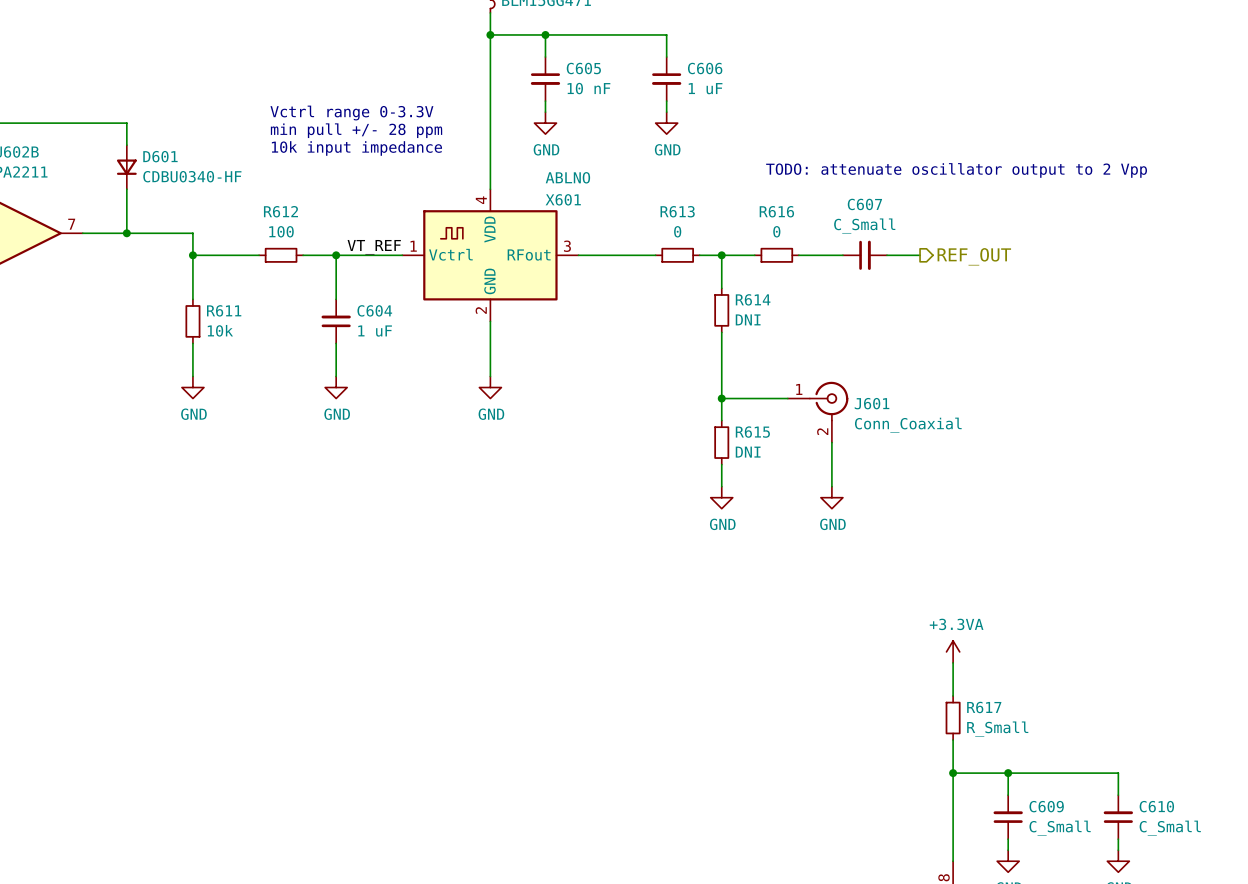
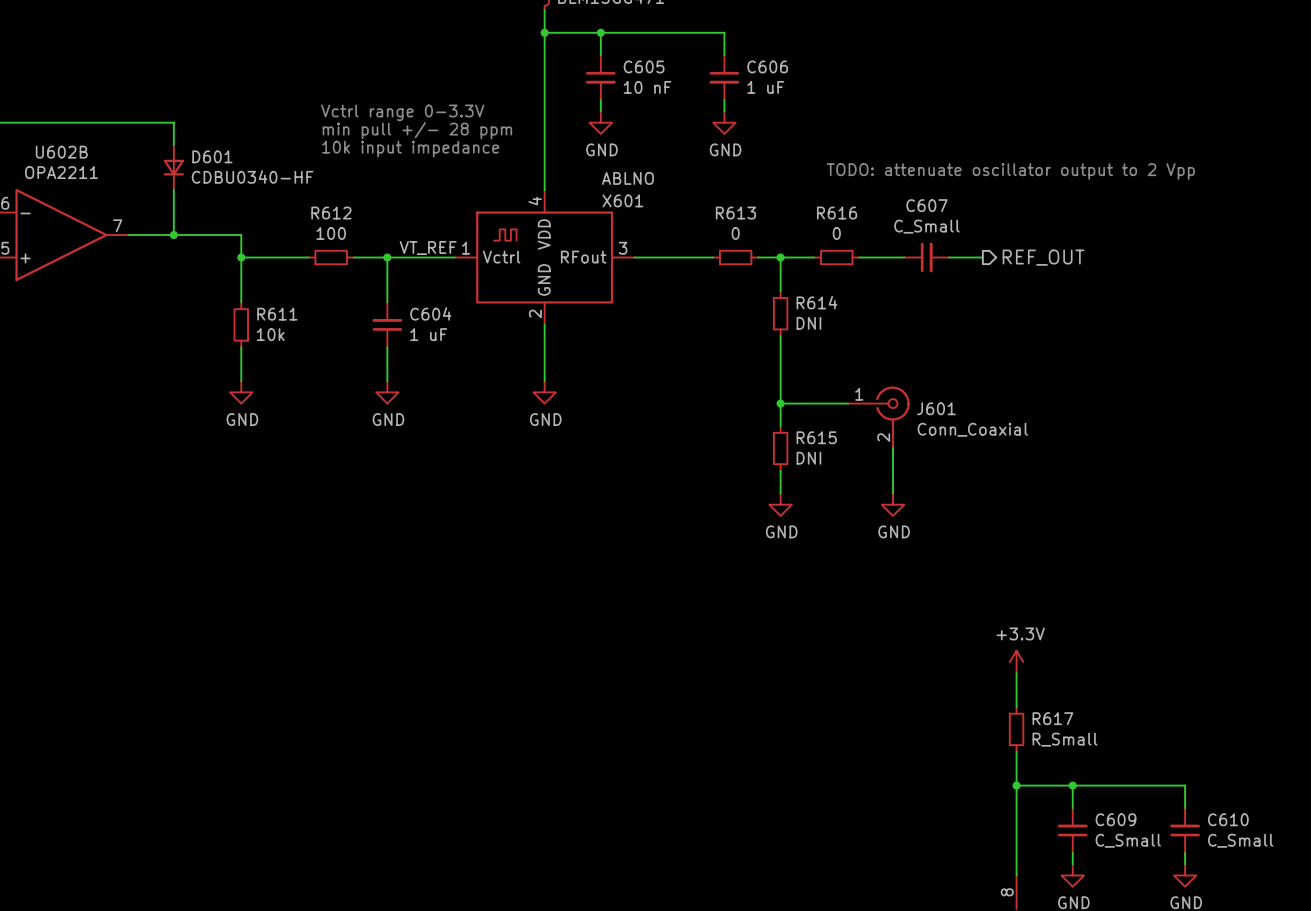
power symbol: +3.3VA (953, 651) -> +3.3V (1016, 662)

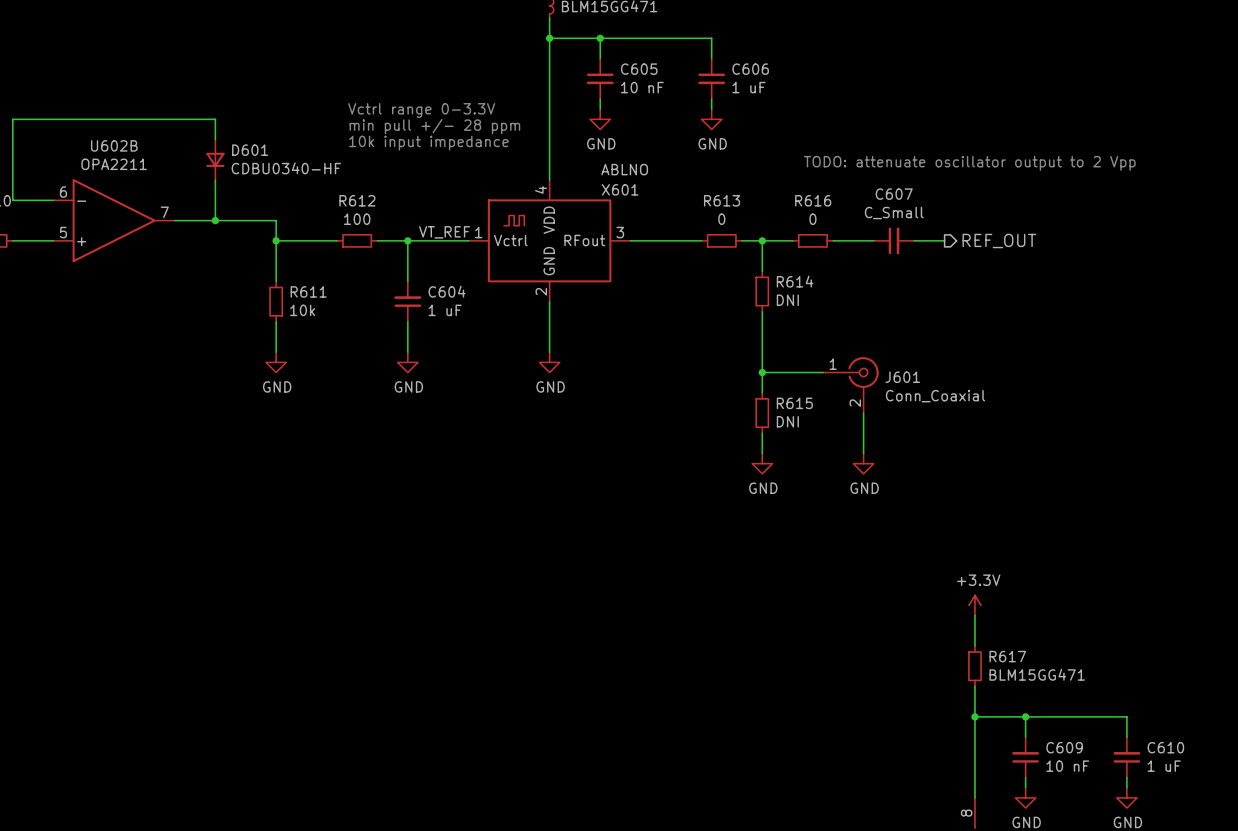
R617 value: R_Small (1064, 739) -> BLM15GG471 (1037, 674)
C609 value: C_Small (1128, 840) -> 10 nF (1067, 766)
C610 value: C_Small (1240, 840) -> 1 uF (1164, 766)

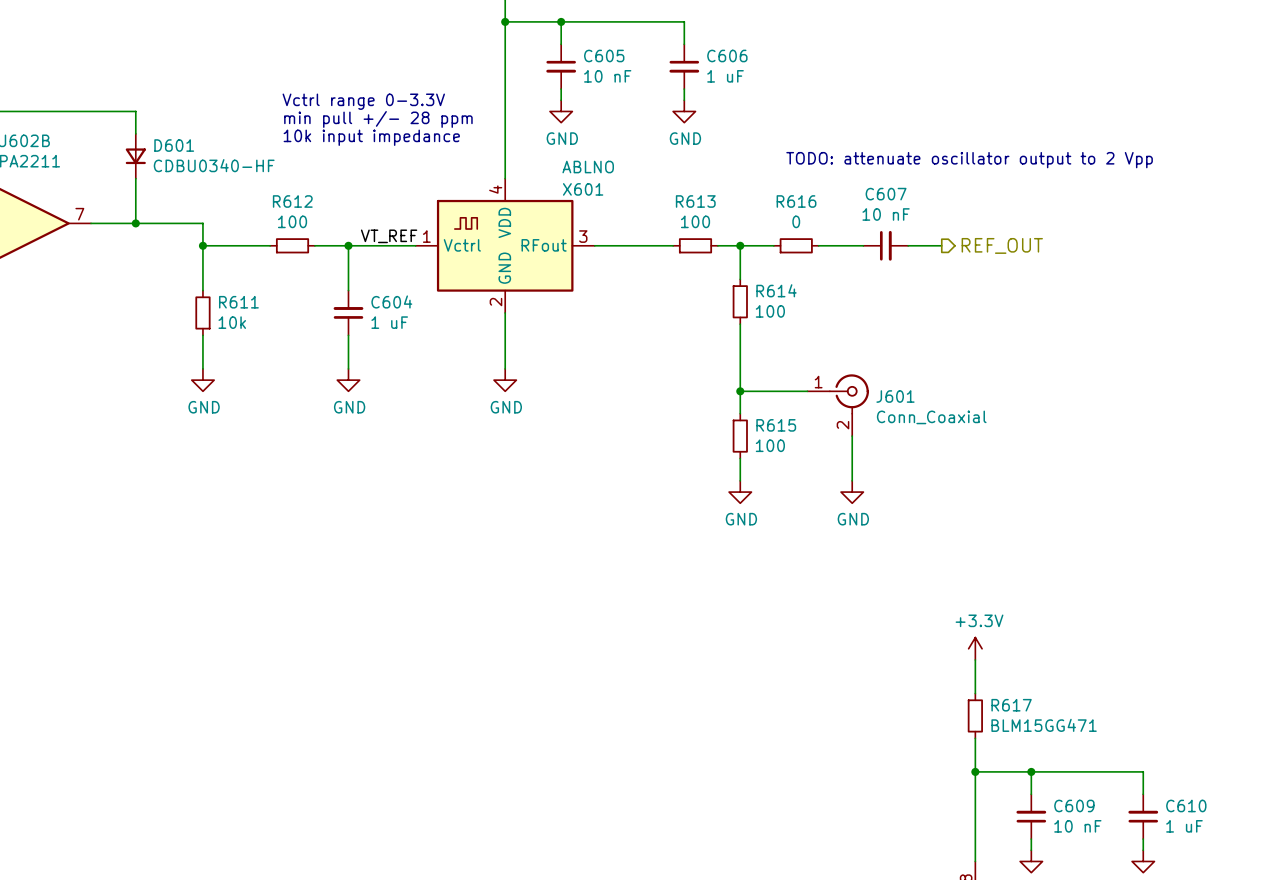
C607 value: C_Small (894, 213) -> 10 nF (886, 214)
R613 value: 0 (721, 219) -> 100 (695, 221)
R614 value: DNI (787, 300) -> 100 (770, 311)
R615 value: DNI (787, 421) -> 100 (770, 445)

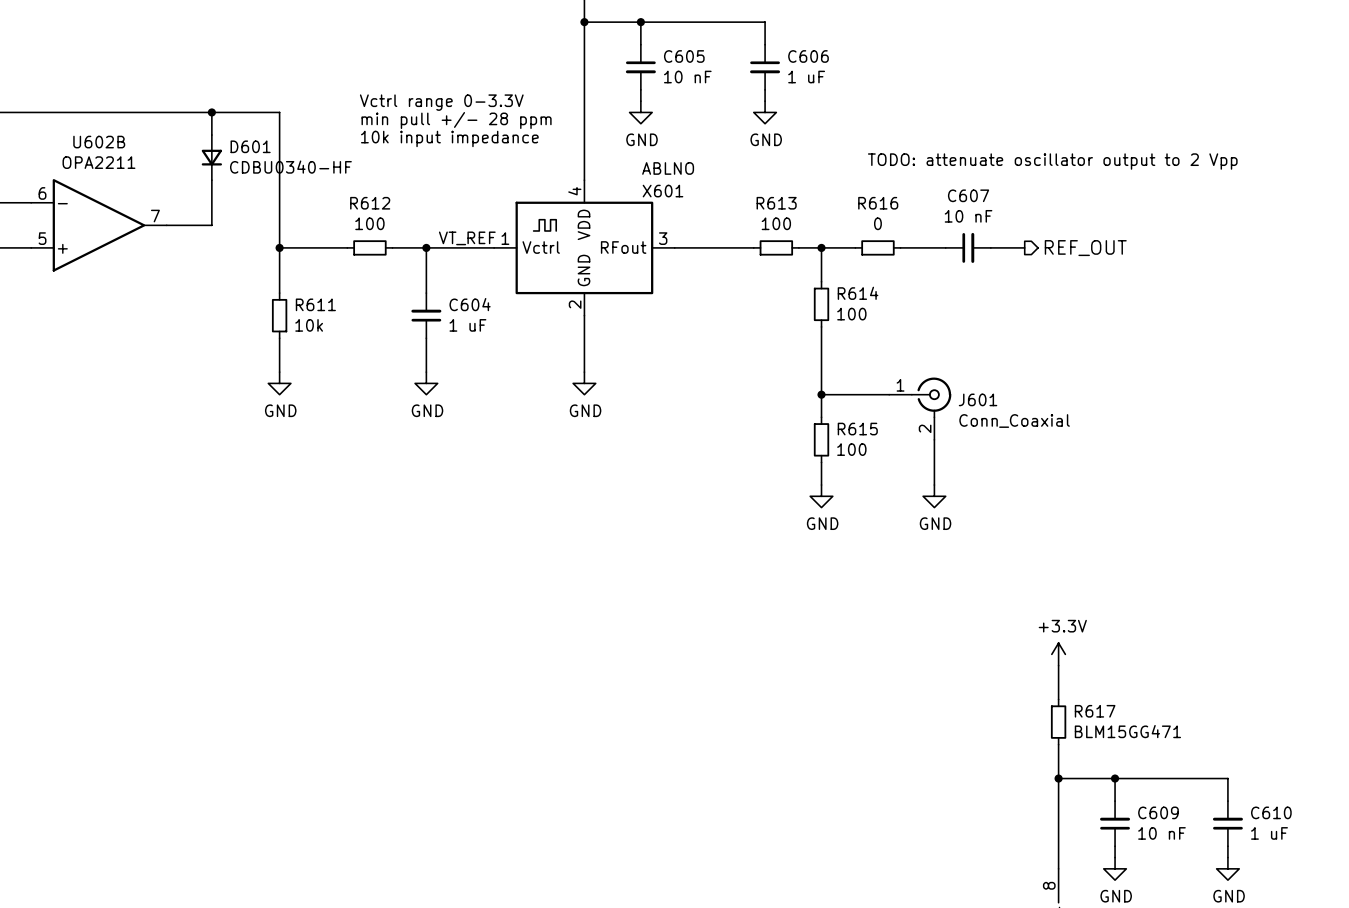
junction: none -> (211, 112)
wire: (135, 223) (202, 223) -> (211, 112) (279, 112) (279, 225)
junction: (135, 223) -> none

